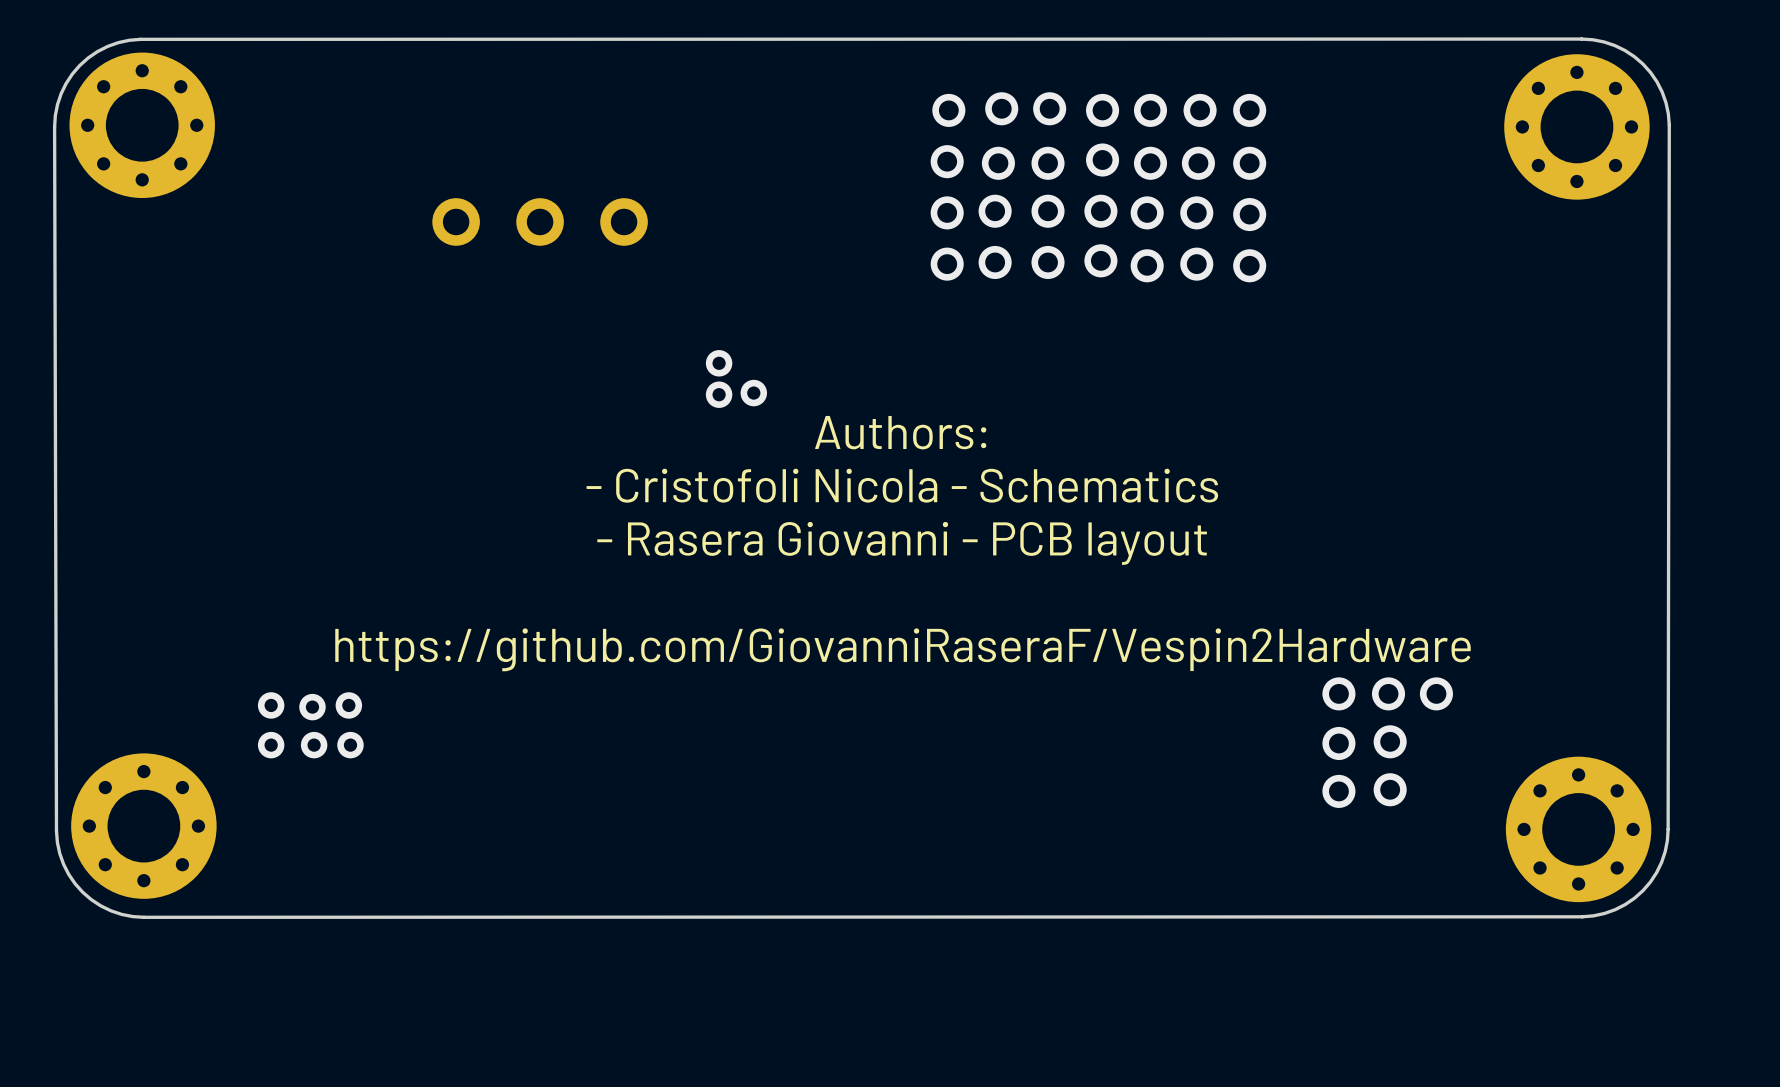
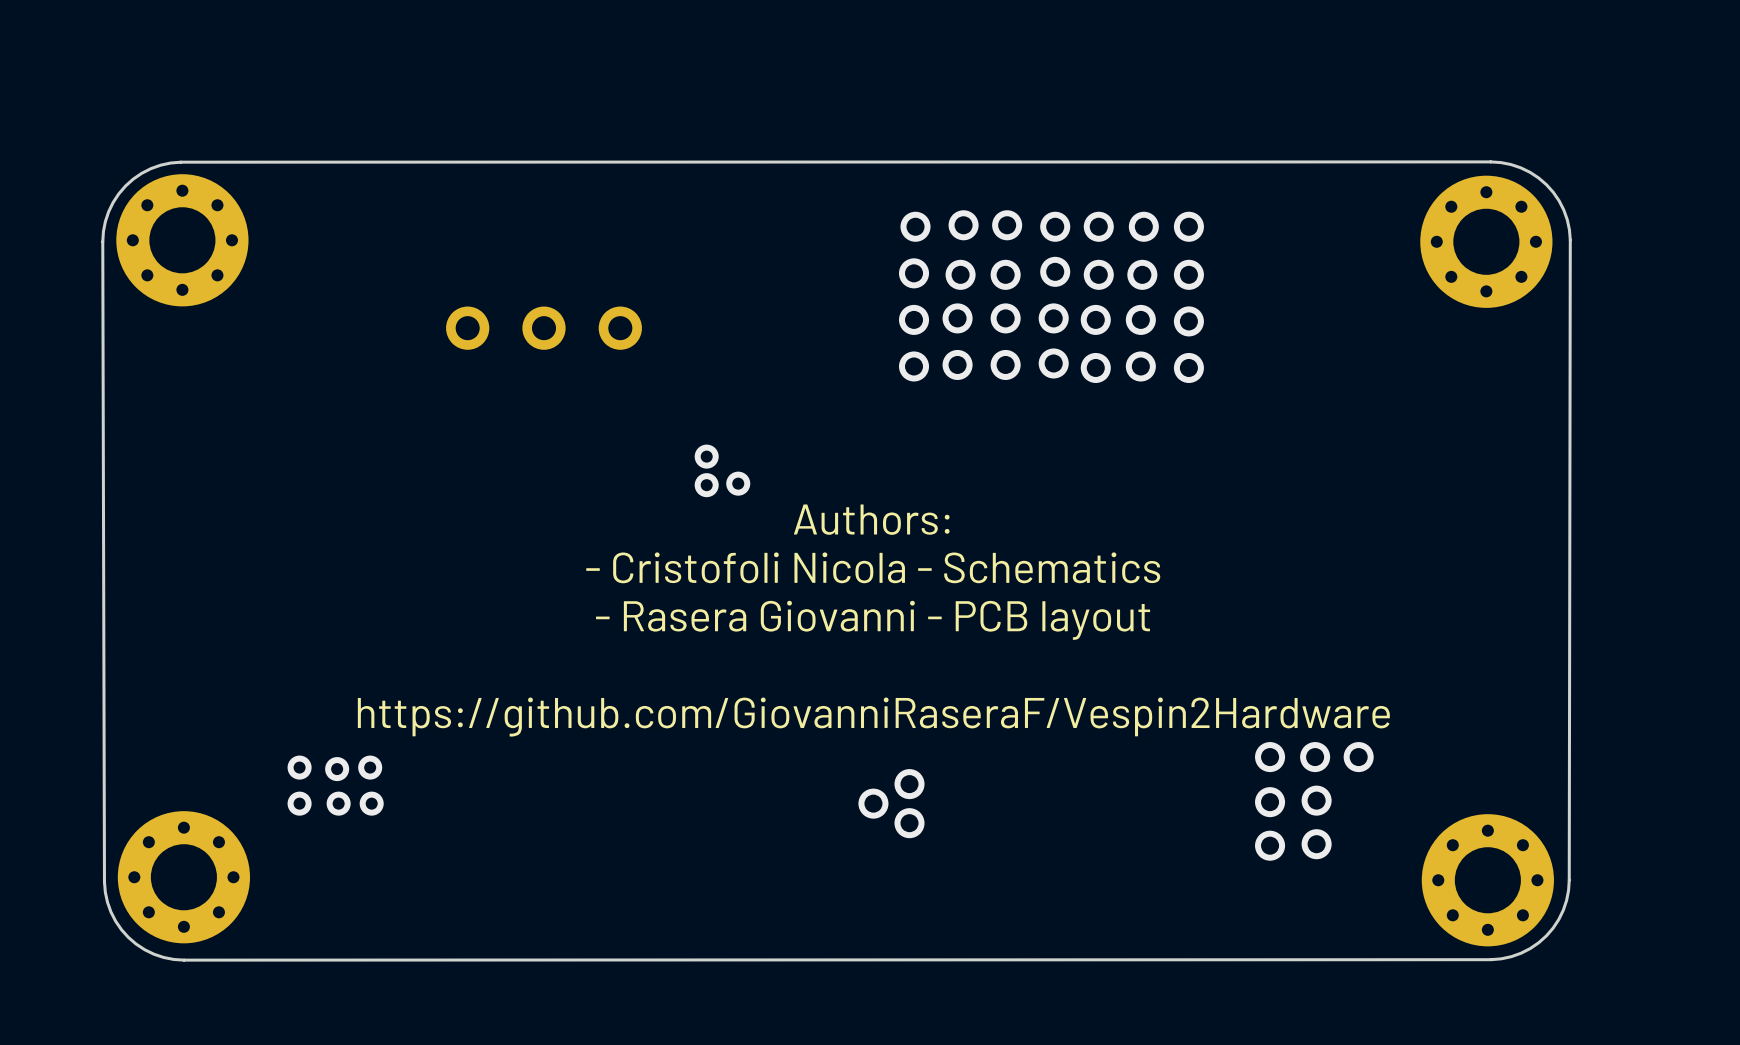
via: none -> (909, 784)
via: none -> (873, 803)
via: none -> (909, 823)

